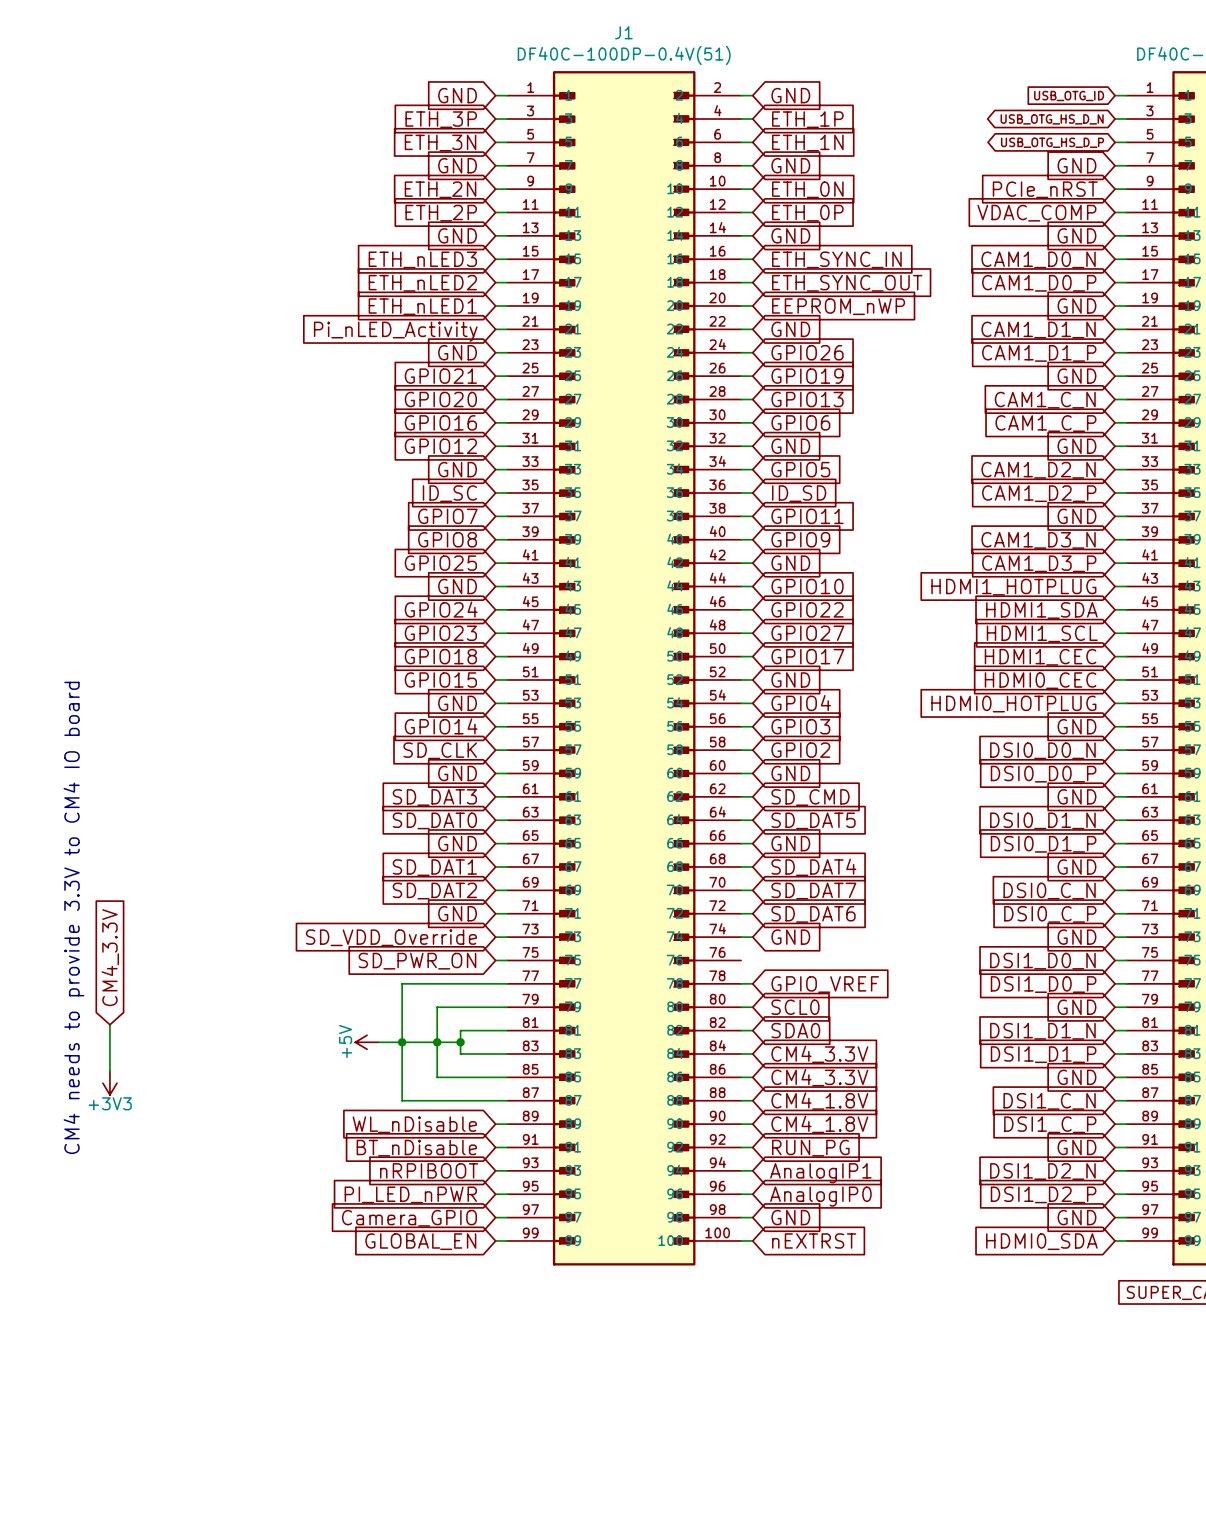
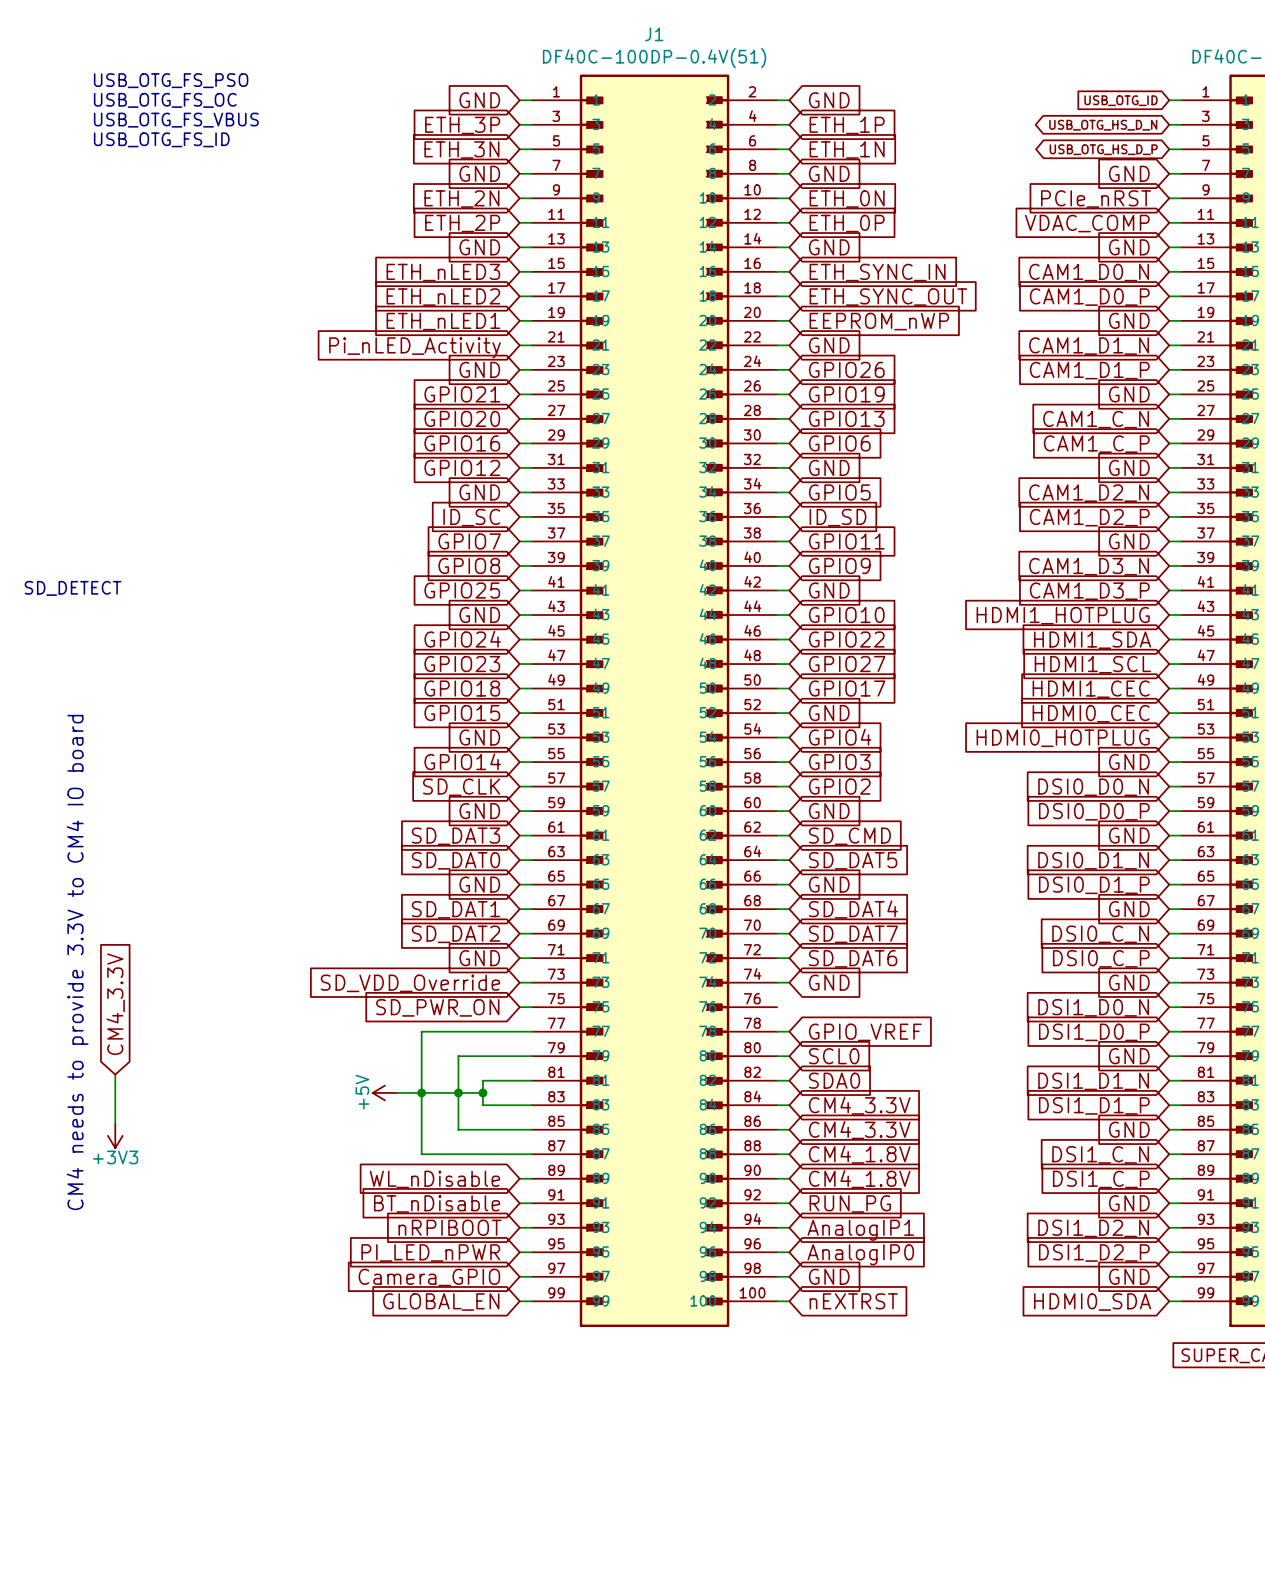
text: none -> USB_OTG_FS_PSO (171, 80)
text: none -> USB_OTG_FS_OC (165, 100)
text: none -> USB_OTG_FS_VBUS (176, 120)
text: none -> USB_OTG_FS_ID (161, 139)
text: none -> SD_DETECT (73, 588)

